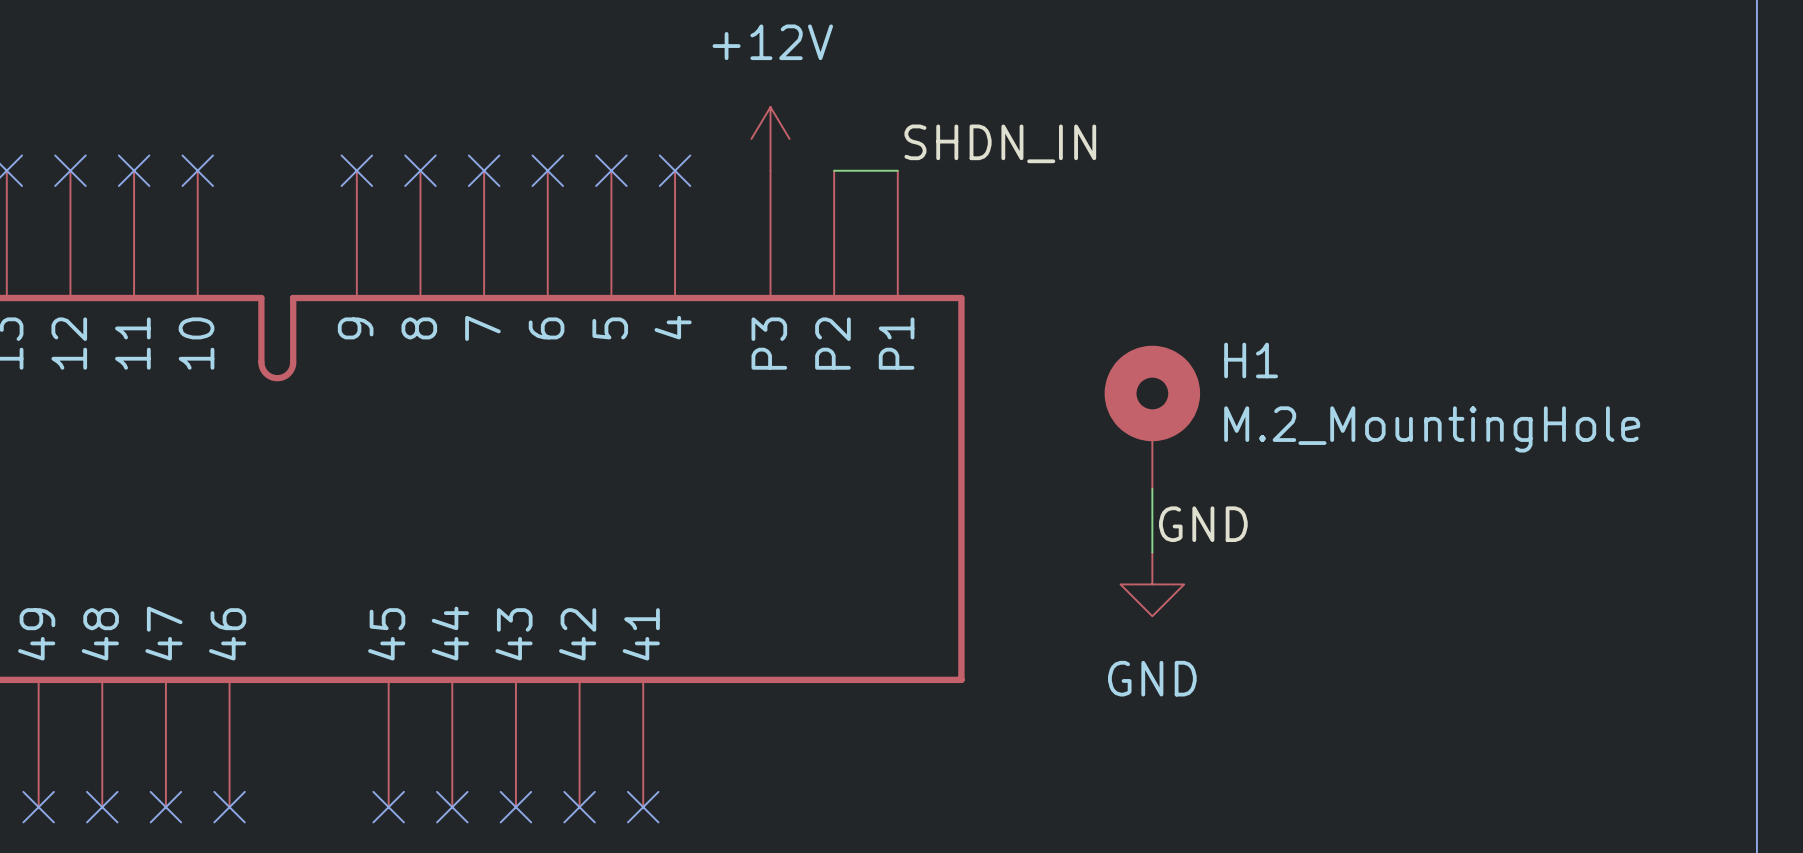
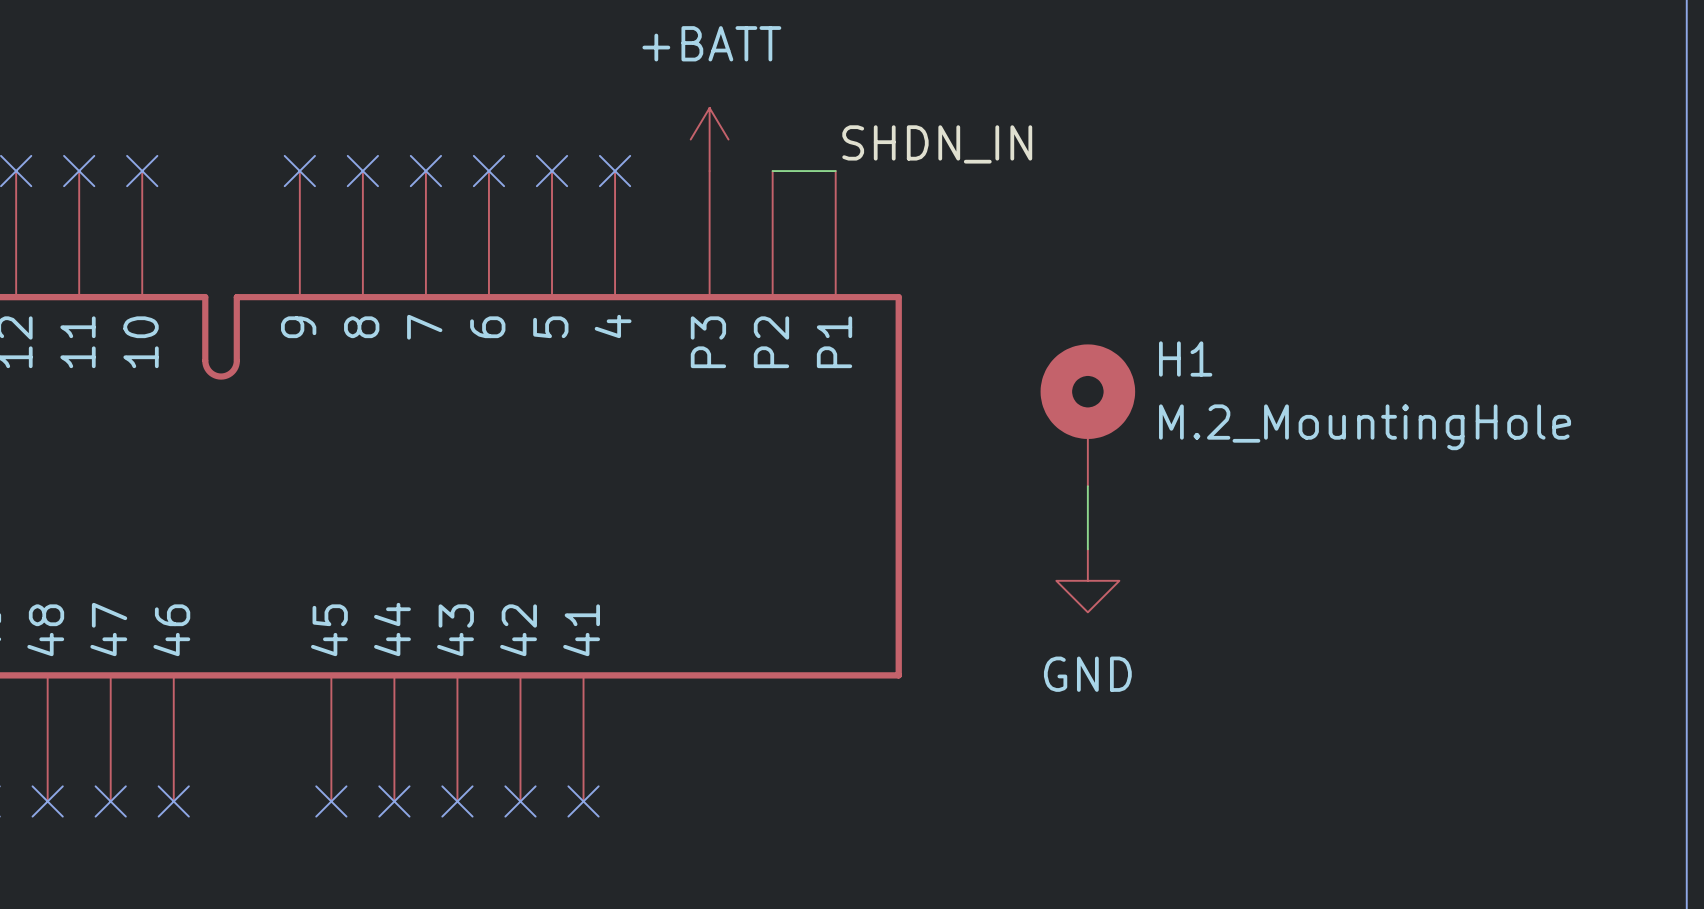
power symbol: +12V (770, 138) -> +BATT (709, 139)
label: GND (1203, 524) -> none

